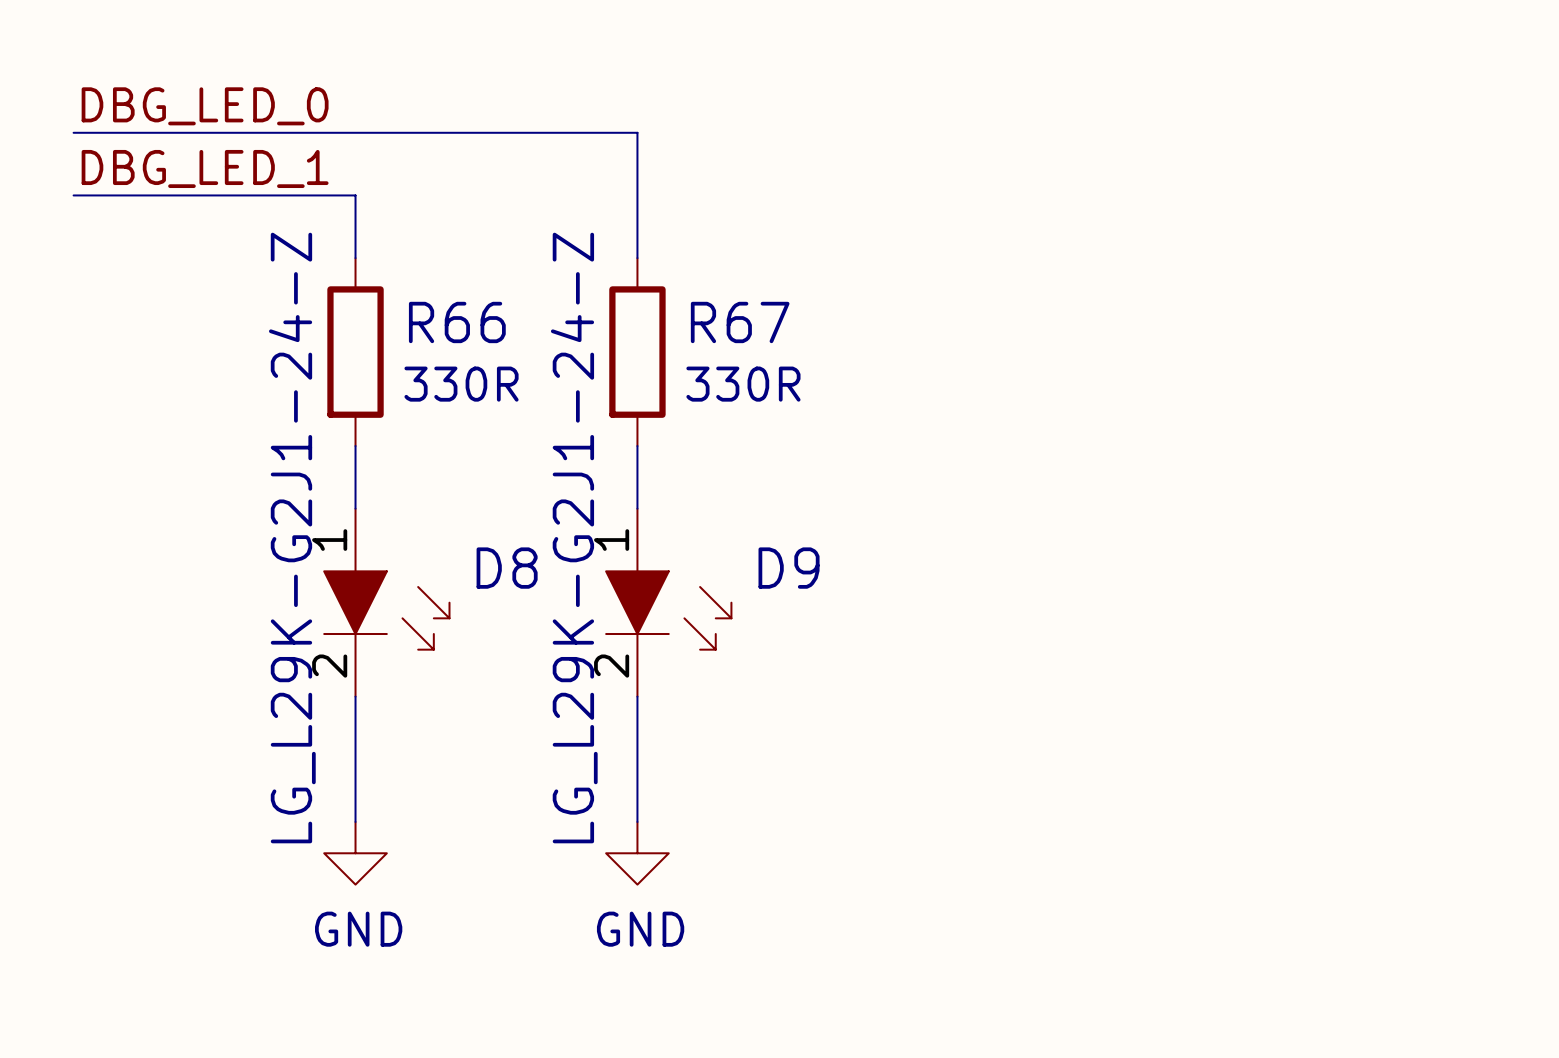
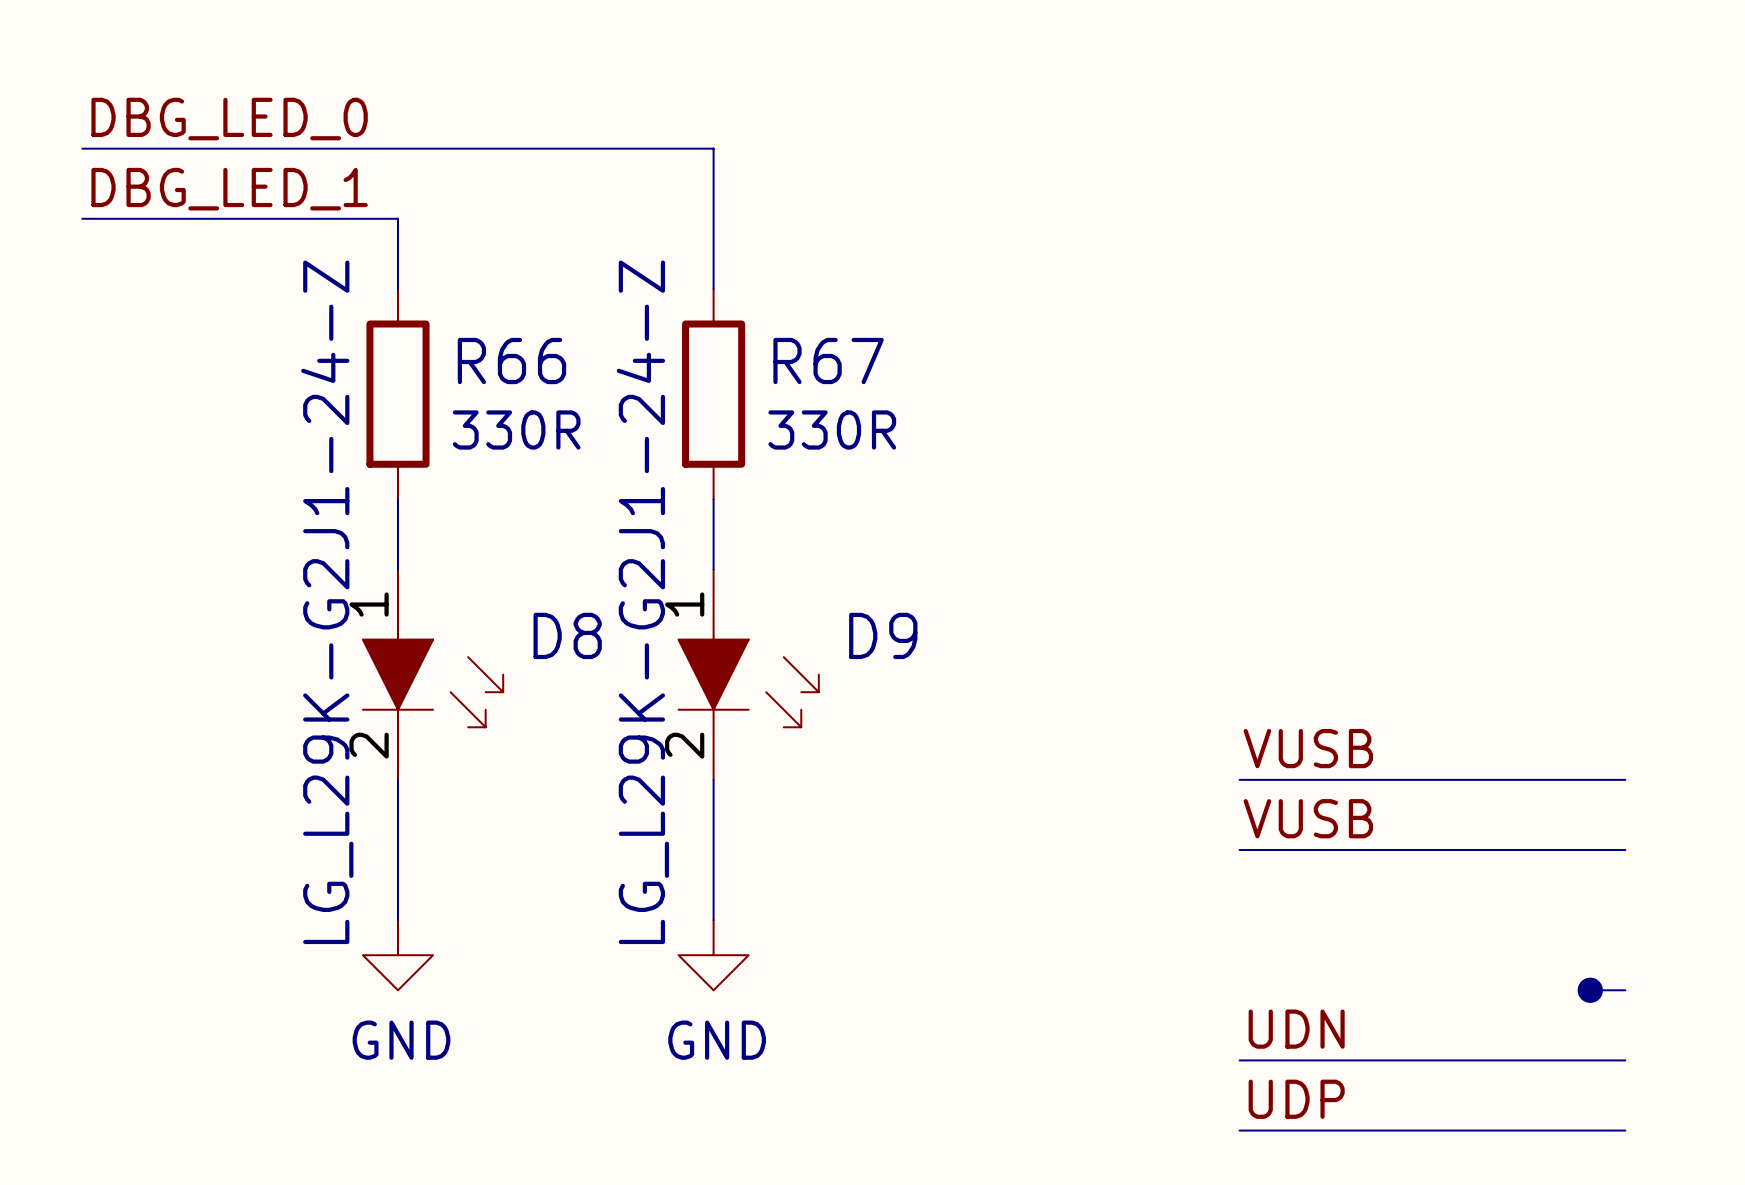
label: none -> VUSB (1308, 748)
wire: none -> (1239, 779) (1625, 779)
label: none -> VUSB (1308, 818)
wire: none -> (1239, 850) (1625, 850)
wire: none -> (1590, 990) (1625, 990)
junction: none -> (1590, 990)
label: none -> UDN (1296, 1029)
wire: none -> (1239, 1060) (1625, 1060)
label: none -> UDP (1296, 1099)
wire: none -> (1239, 1130) (1625, 1130)

